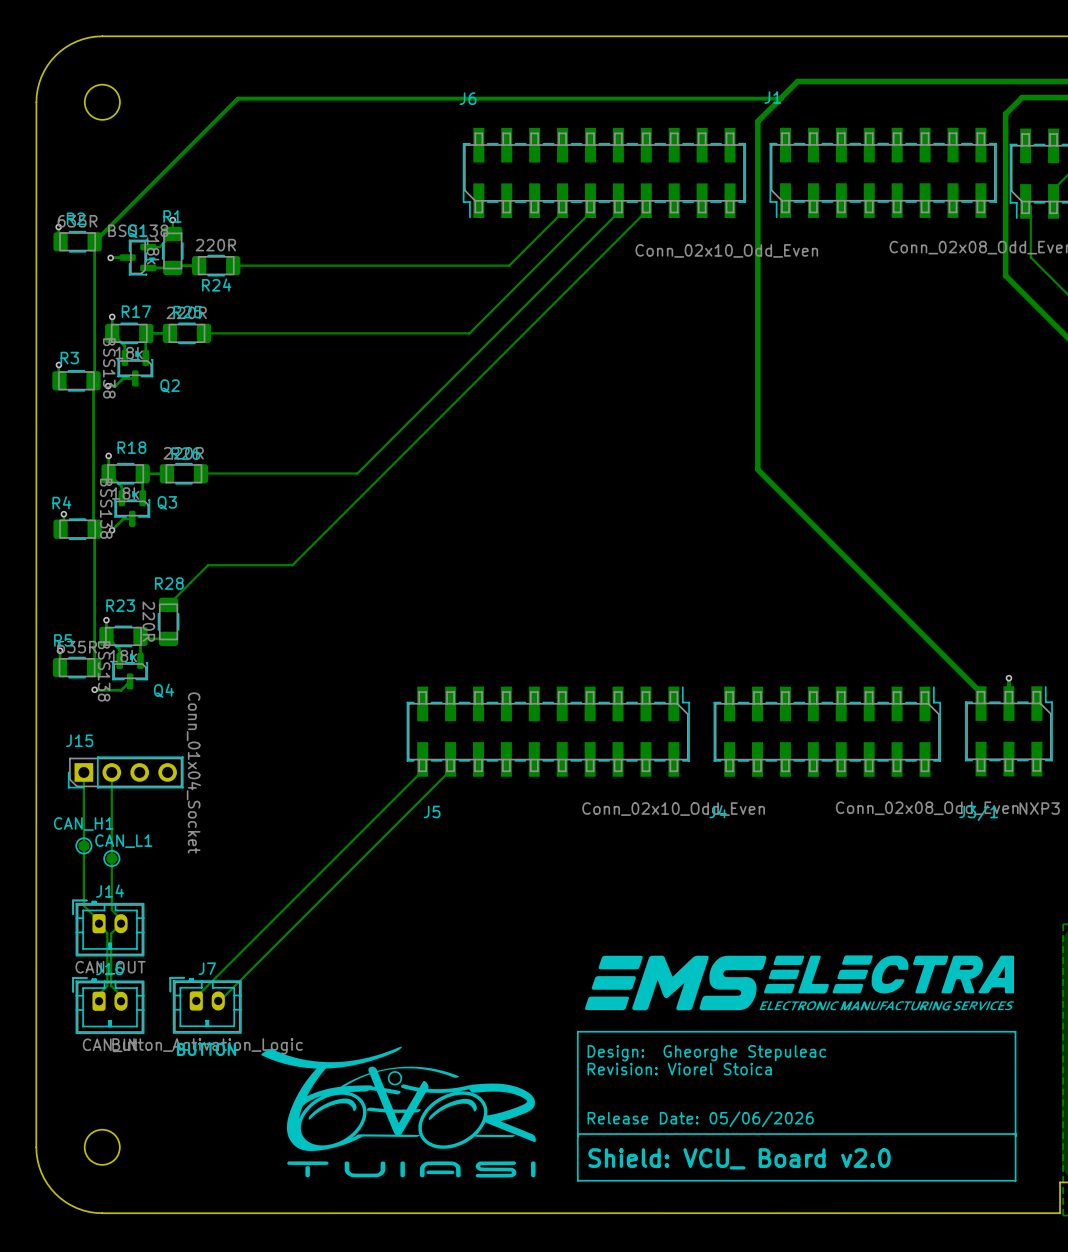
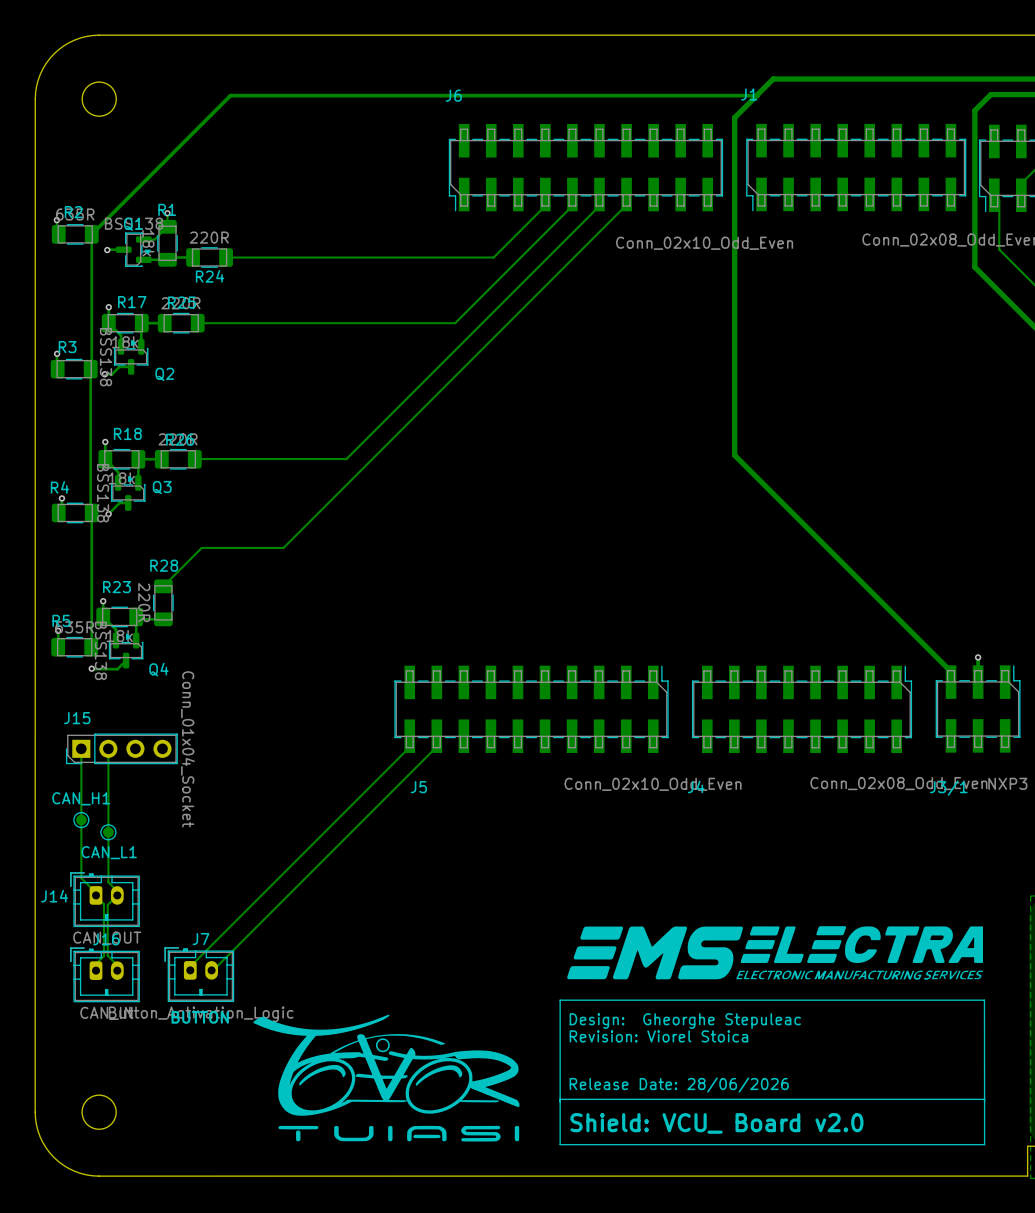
CAN_L1 name position: CAN_L1 (123, 841) -> CAN_L1 (109, 852)
J14 name position: J14 (110, 891) -> J14 (54, 896)
text: Release Date: 05/06/2026 (700, 1119) -> Release Date: 28/06/2026 (679, 1085)

